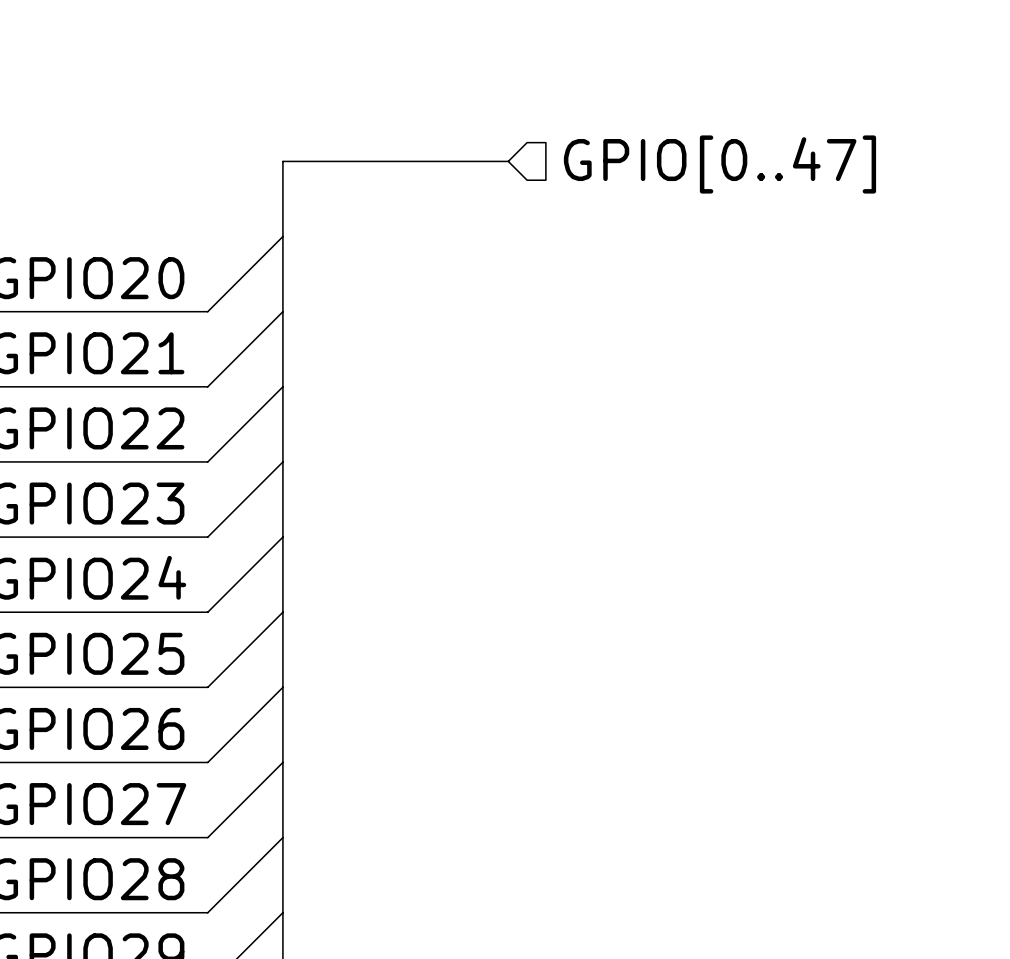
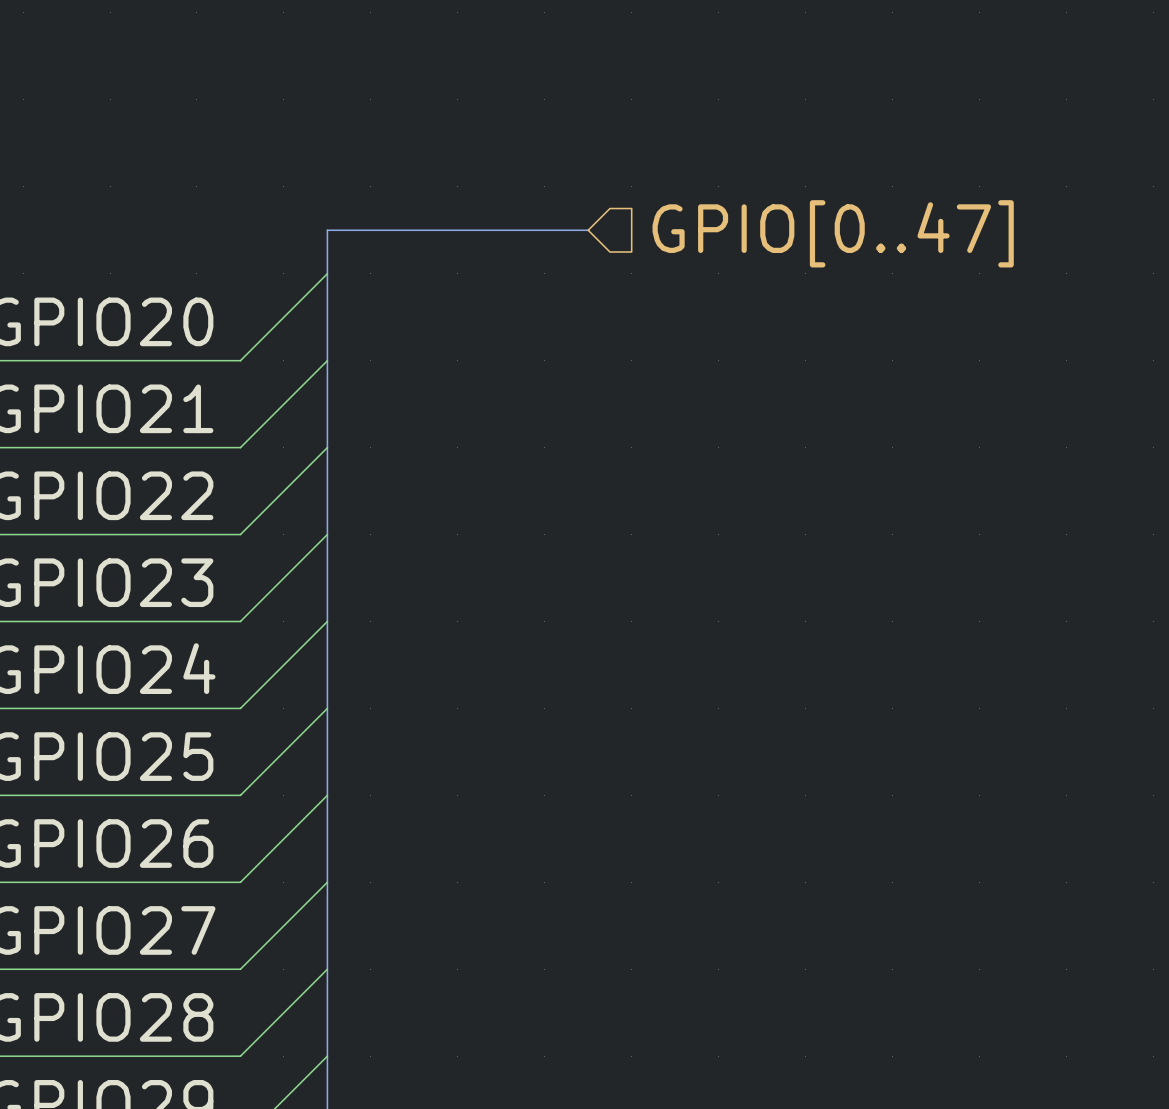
bus: (508, 161) (282, 161) (282, 198) -> (588, 230) (327, 230)
hierarchical label position: GPIO[0..47] (719, 164) -> GPIO[0..47] (833, 233)

